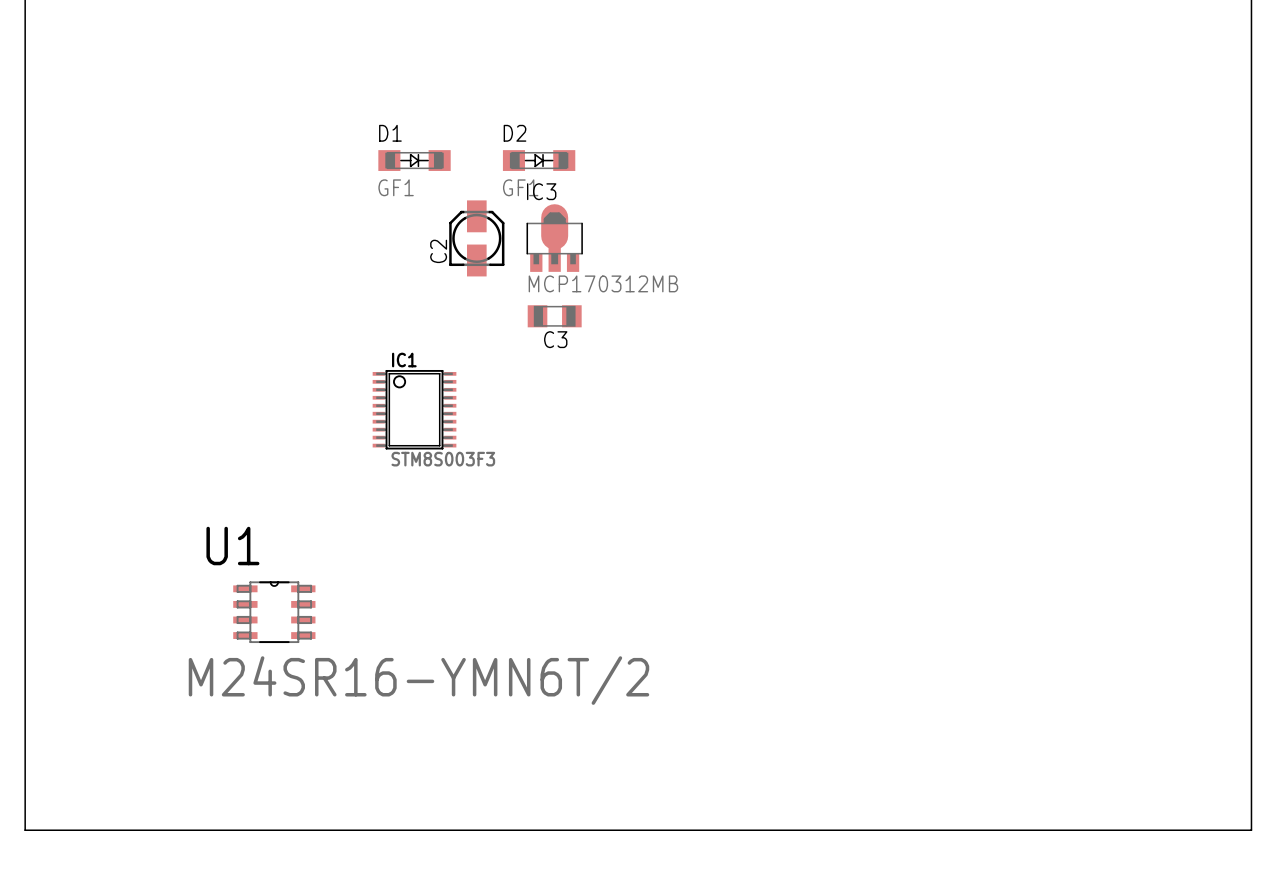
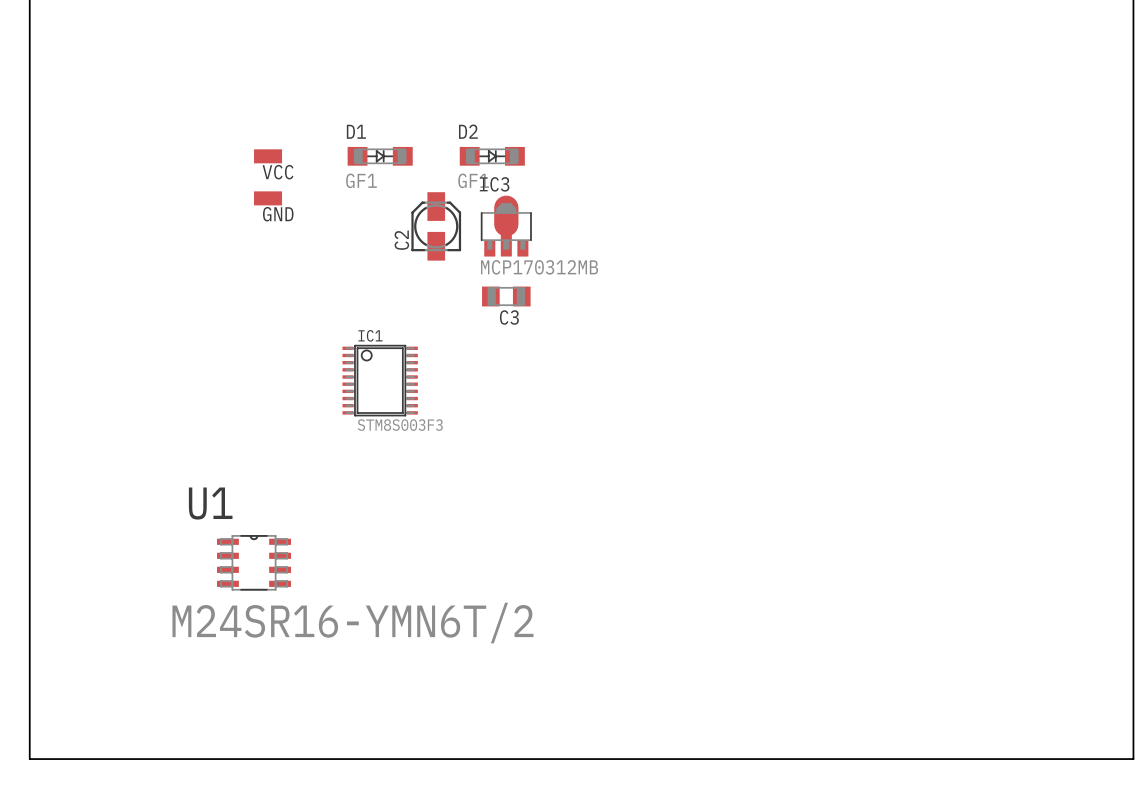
VCC: none -> (268, 156)
GND: none -> (268, 198)

